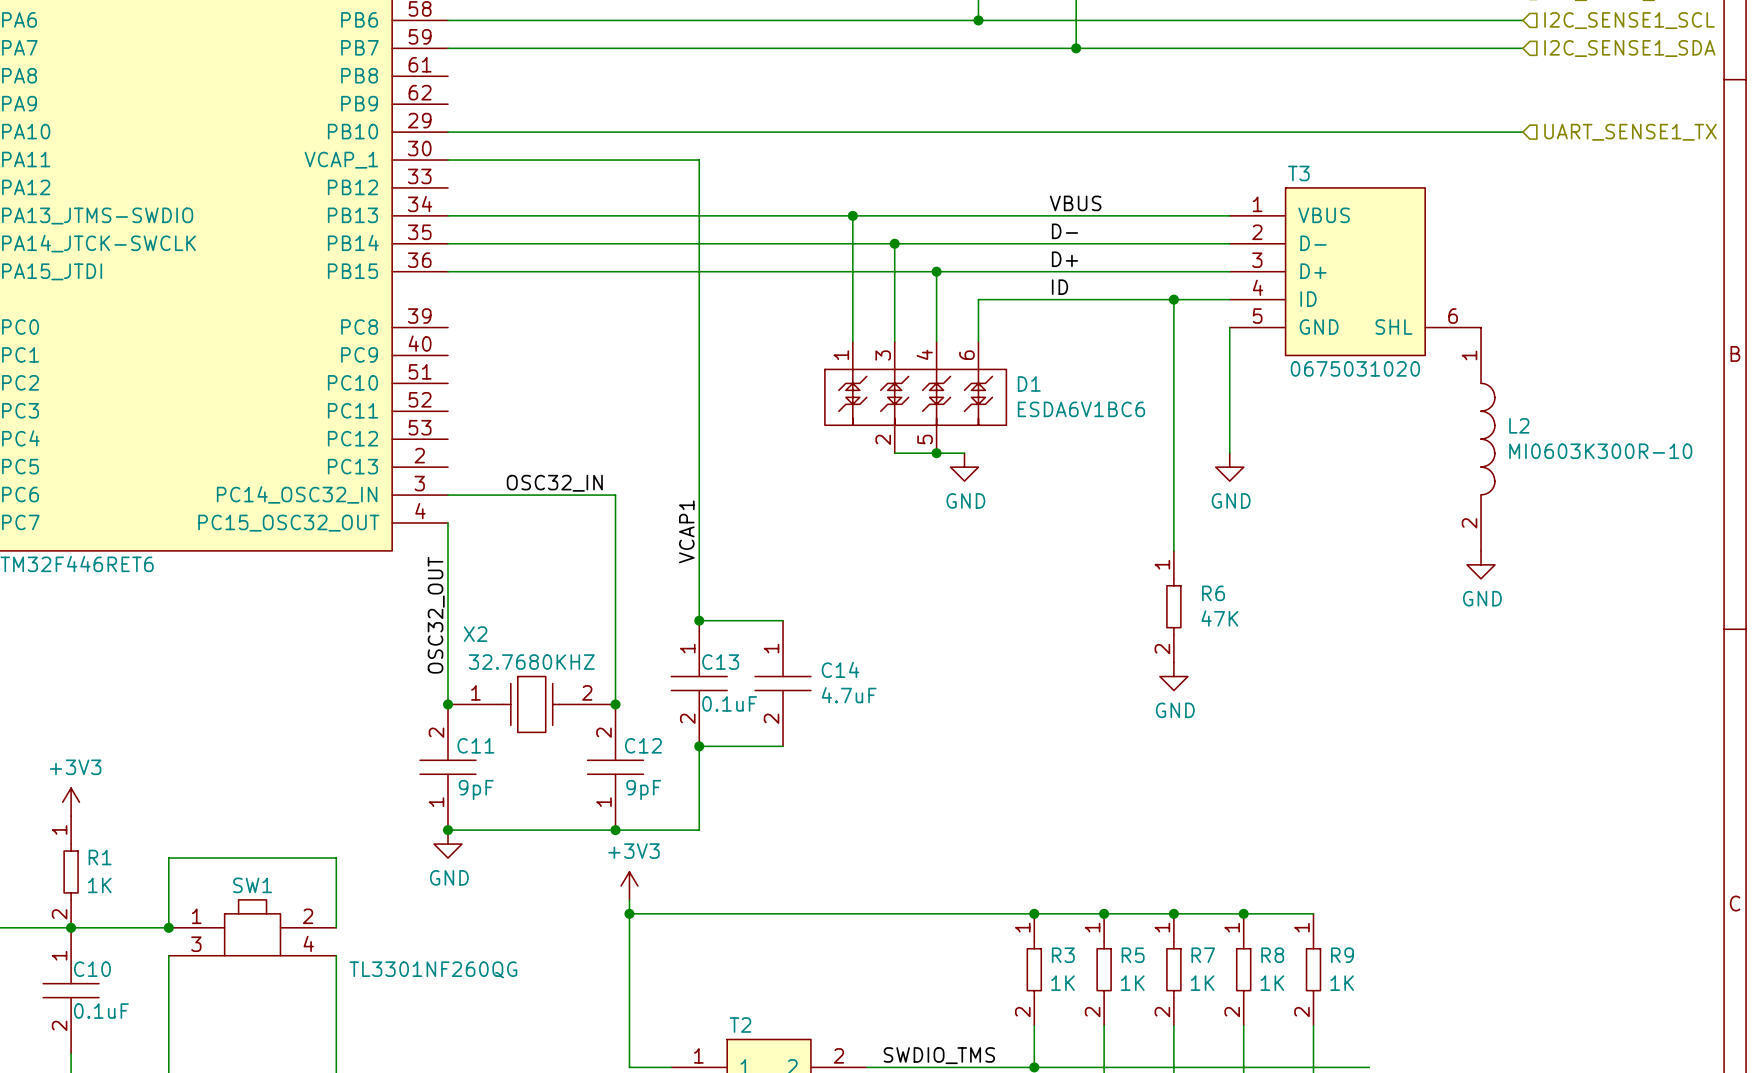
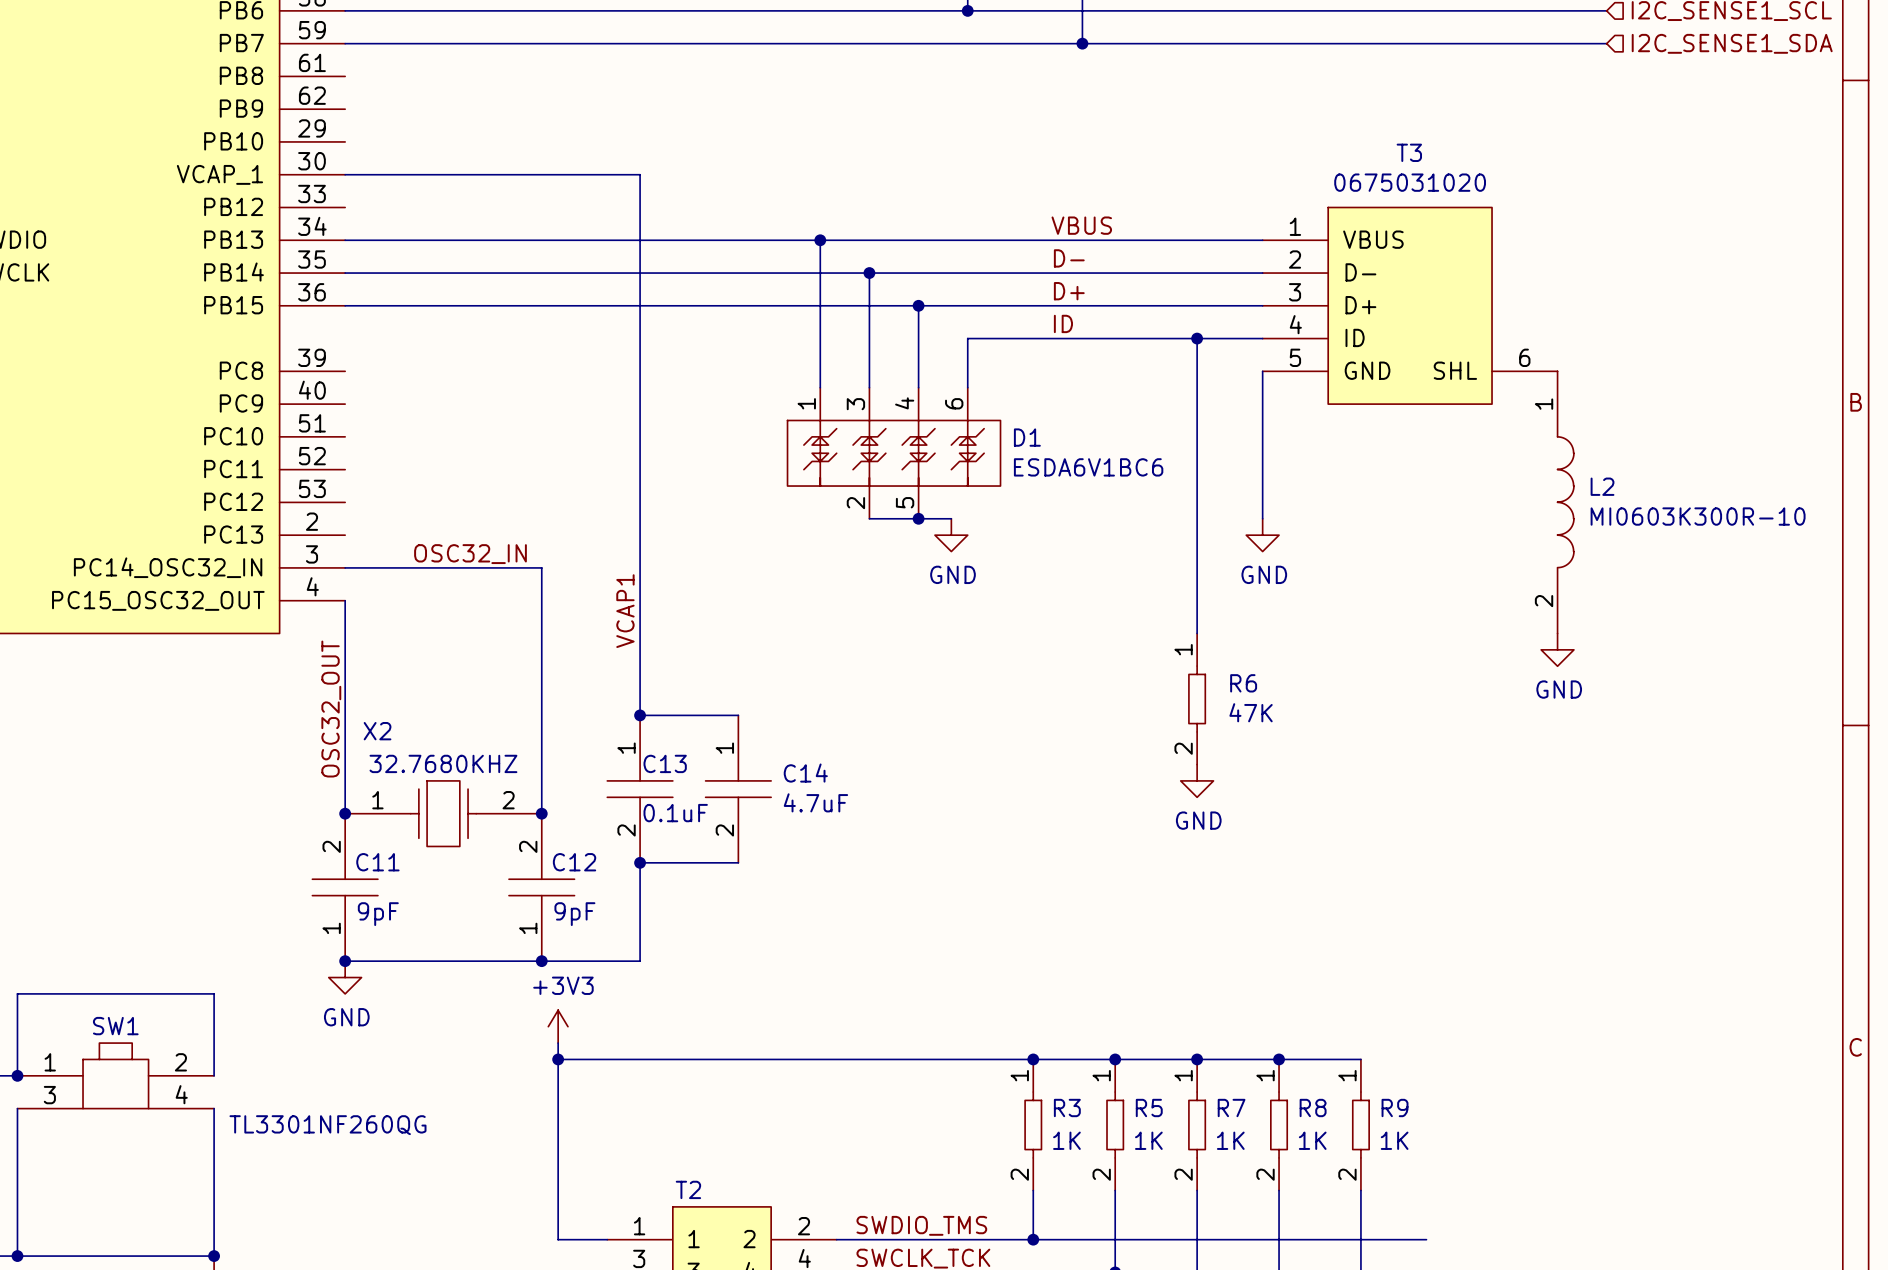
wire: (447, 132) (1522, 132) -> none
hierarchical label: UART_SENSE1_TX (1630, 132) -> none
T3 name position: T3 (1298, 173) -> T3 (1409, 152)
T3 value position: 0675031020 (1355, 368) -> 0675031020 (1410, 182)

